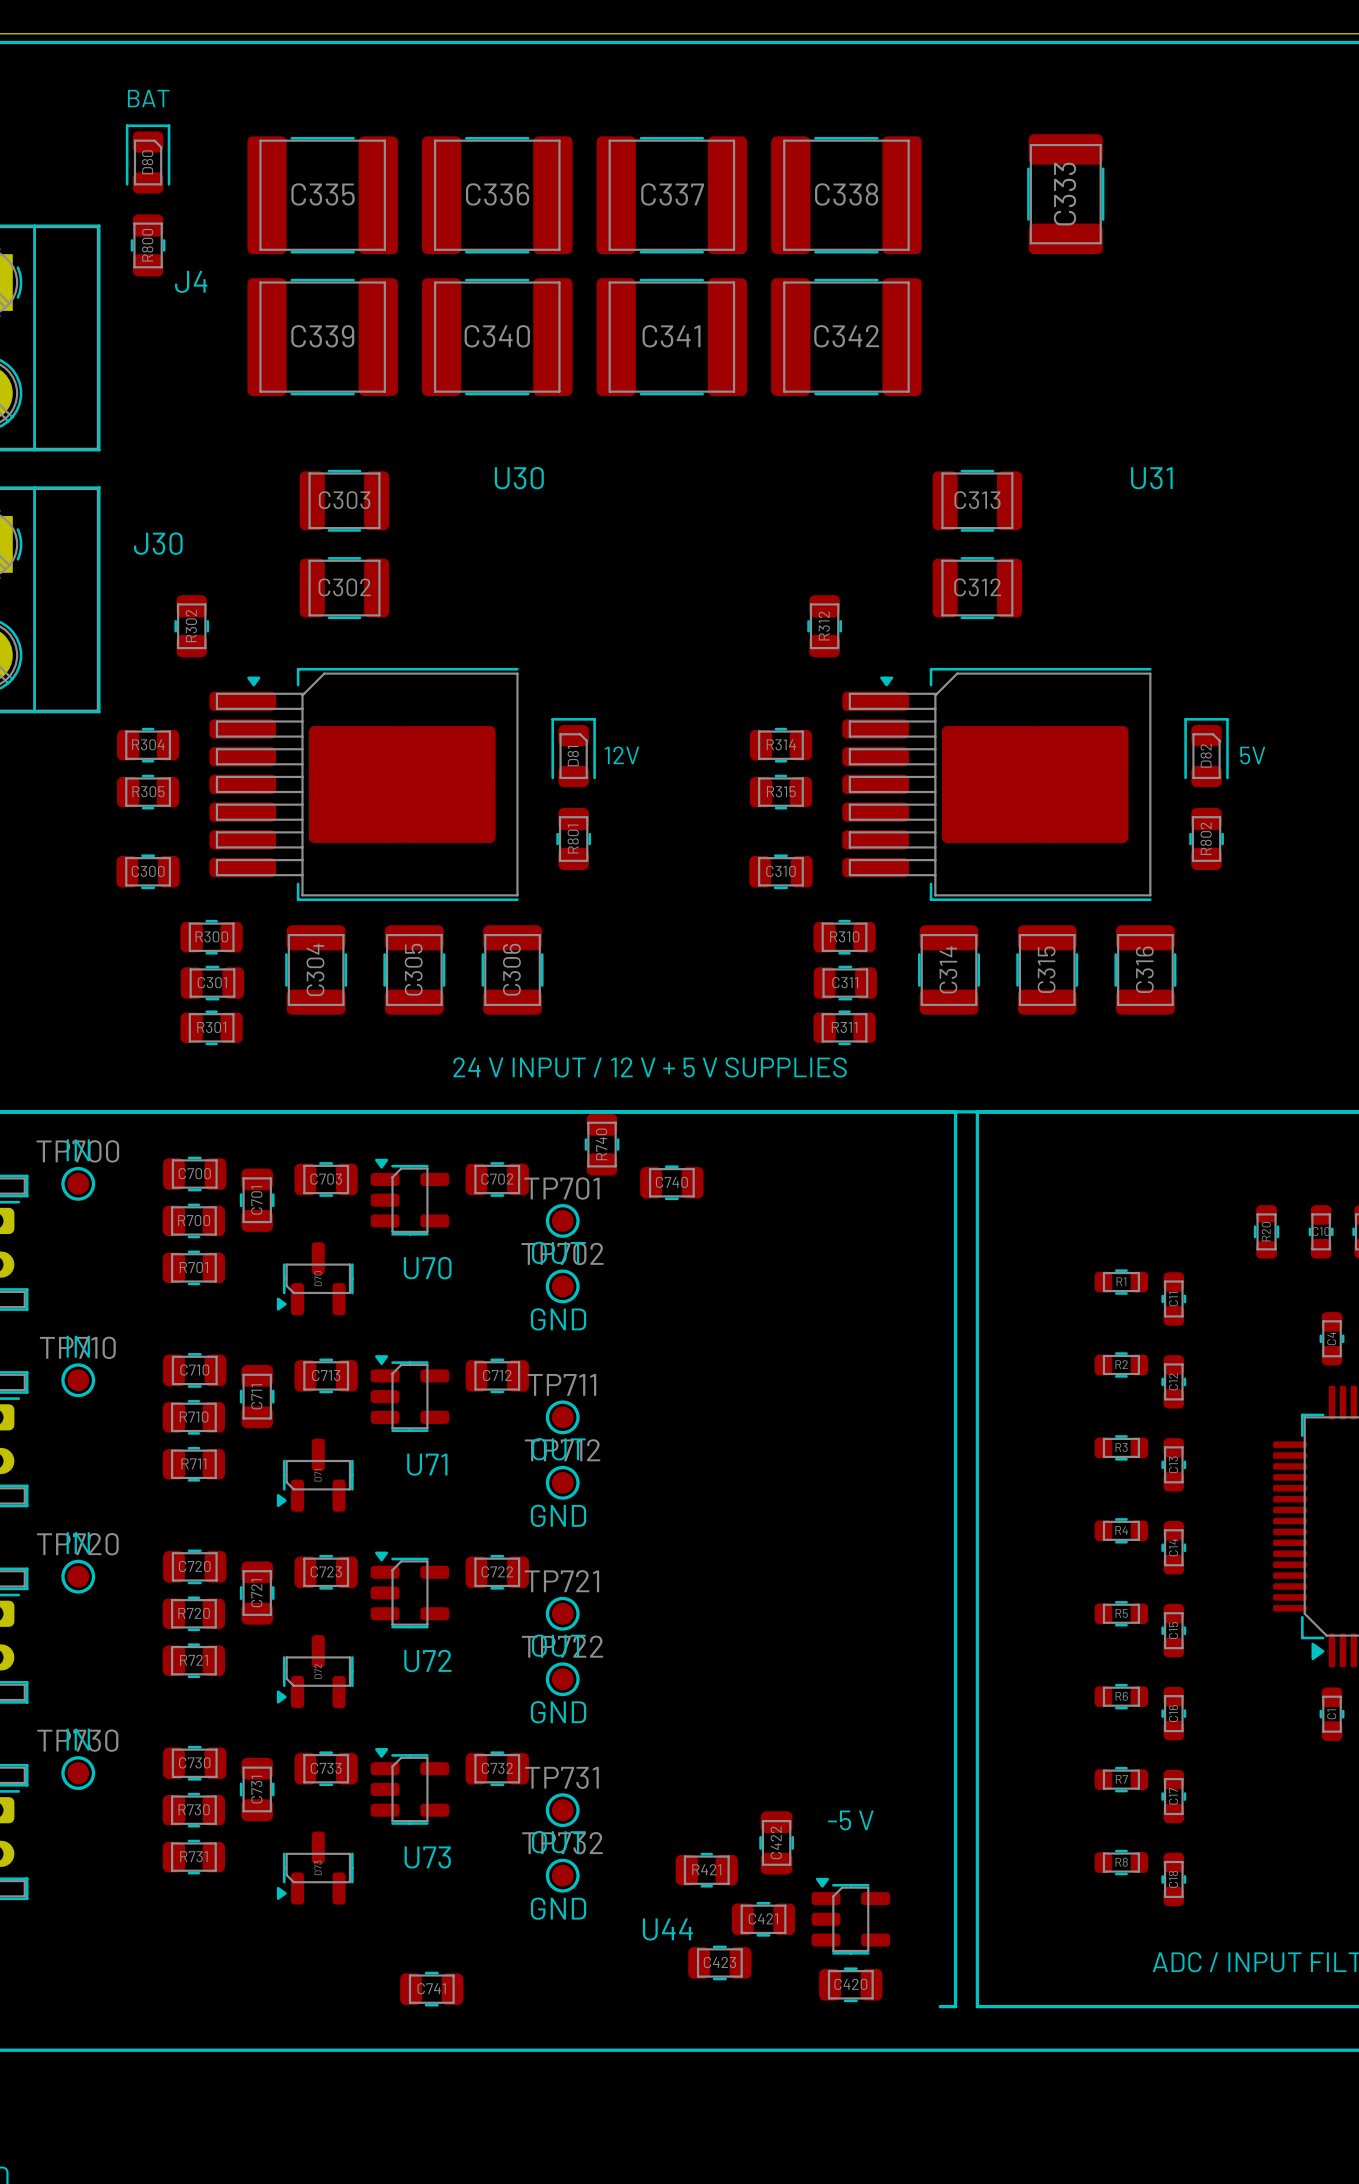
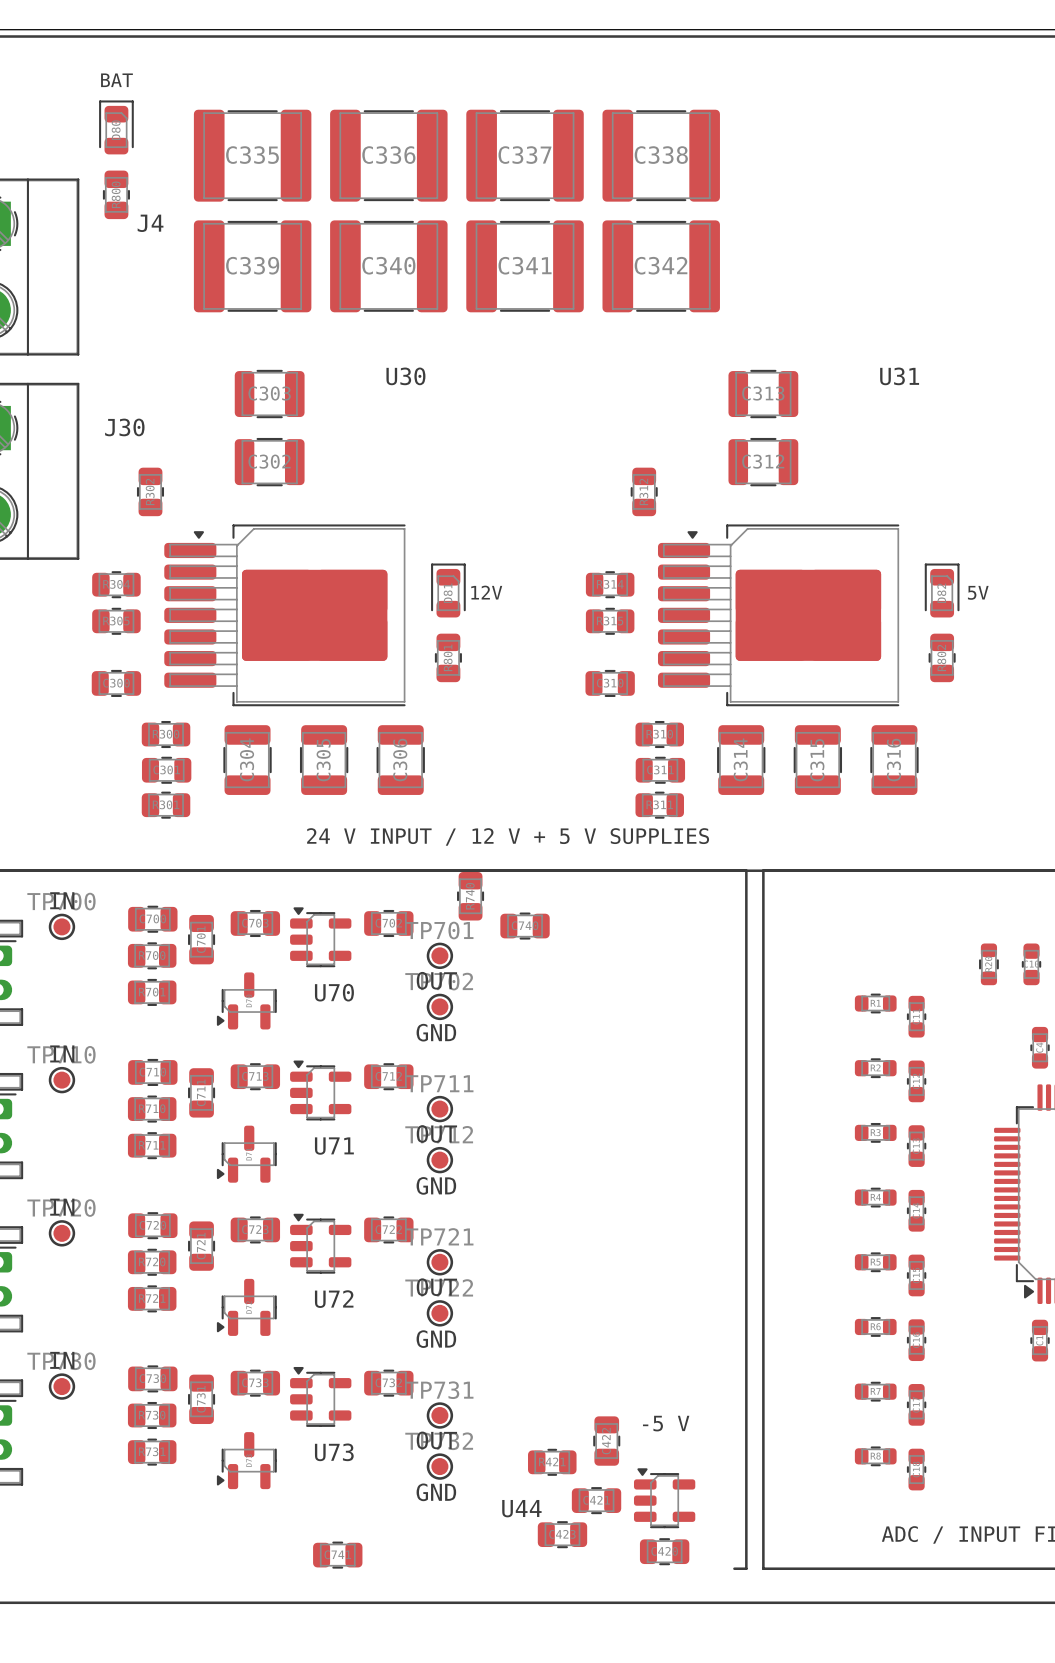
C333: (1065, 194) -> none

